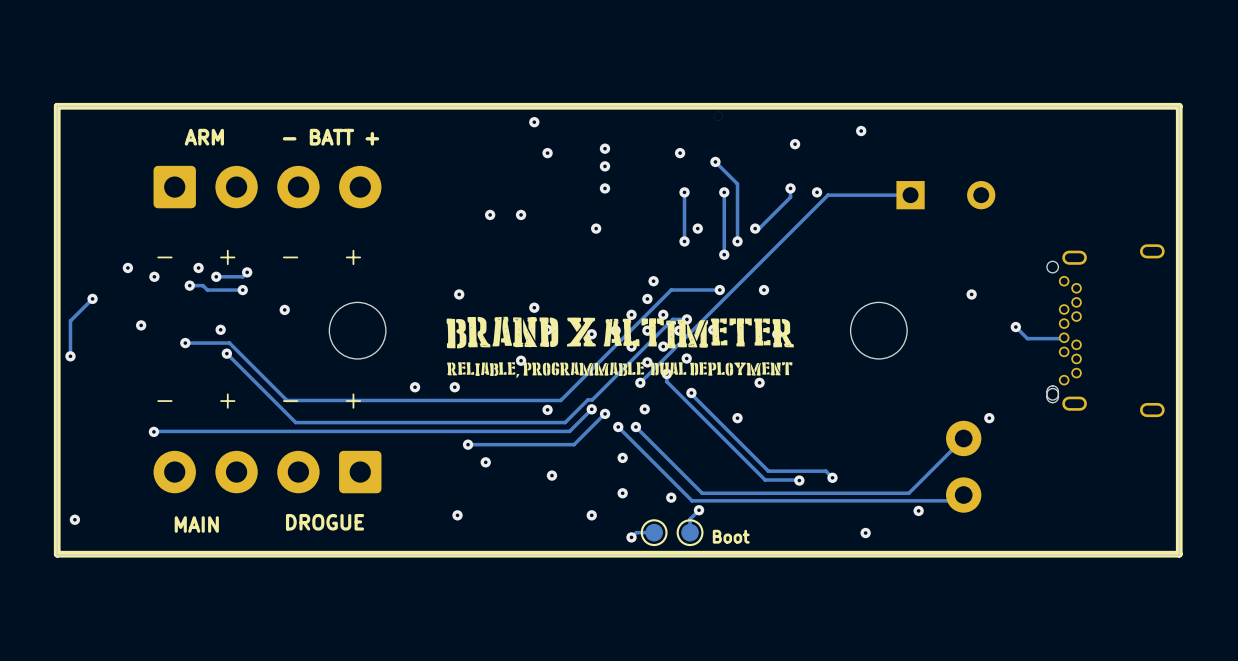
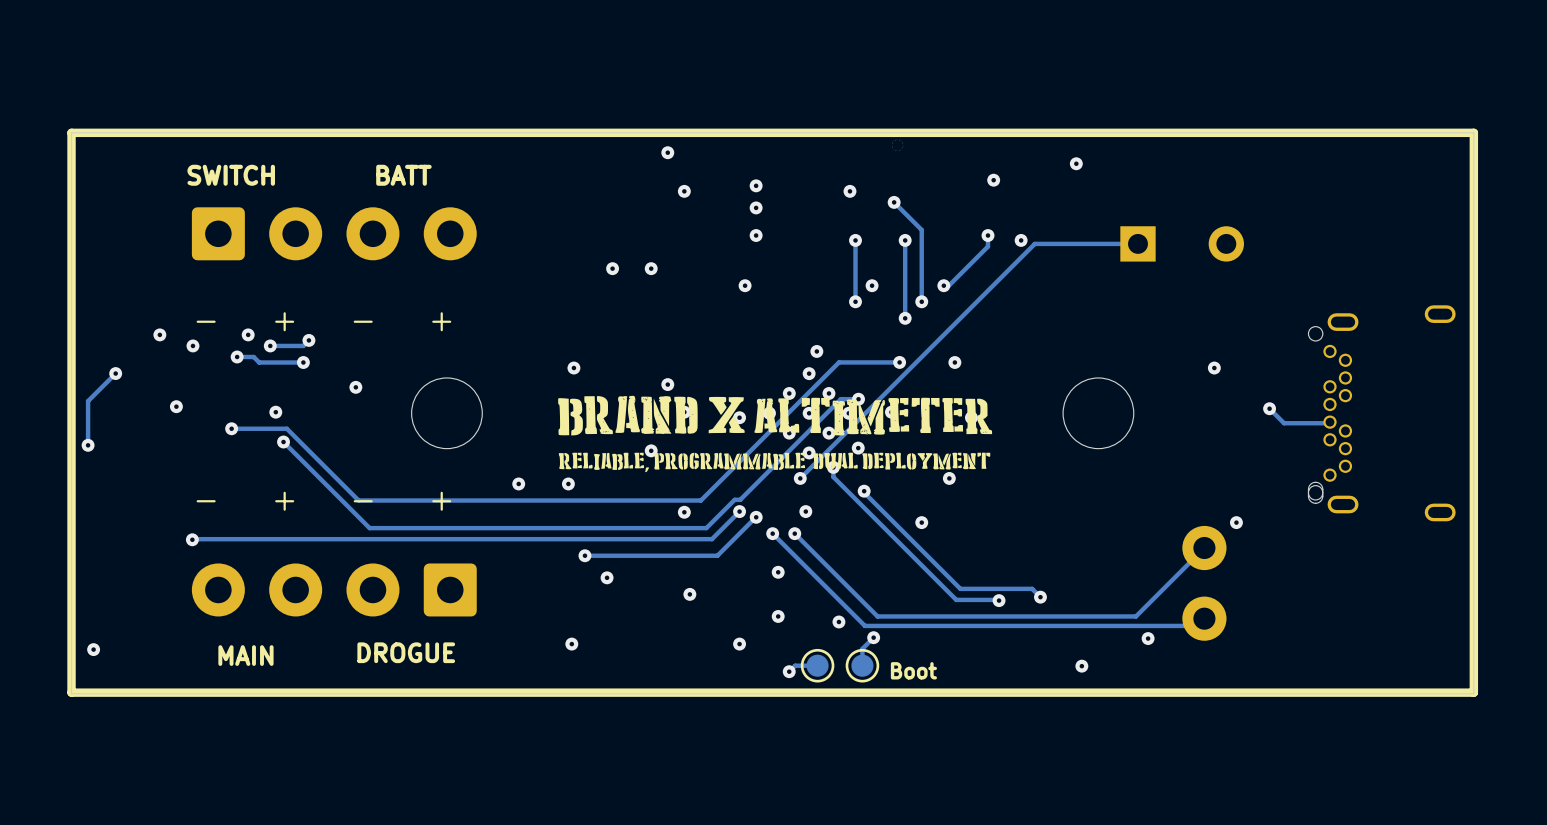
text: ARM (204, 137) -> none
text: - BATT + (331, 137) -> BATT (403, 175)
text: none -> SWITCH (231, 175)

